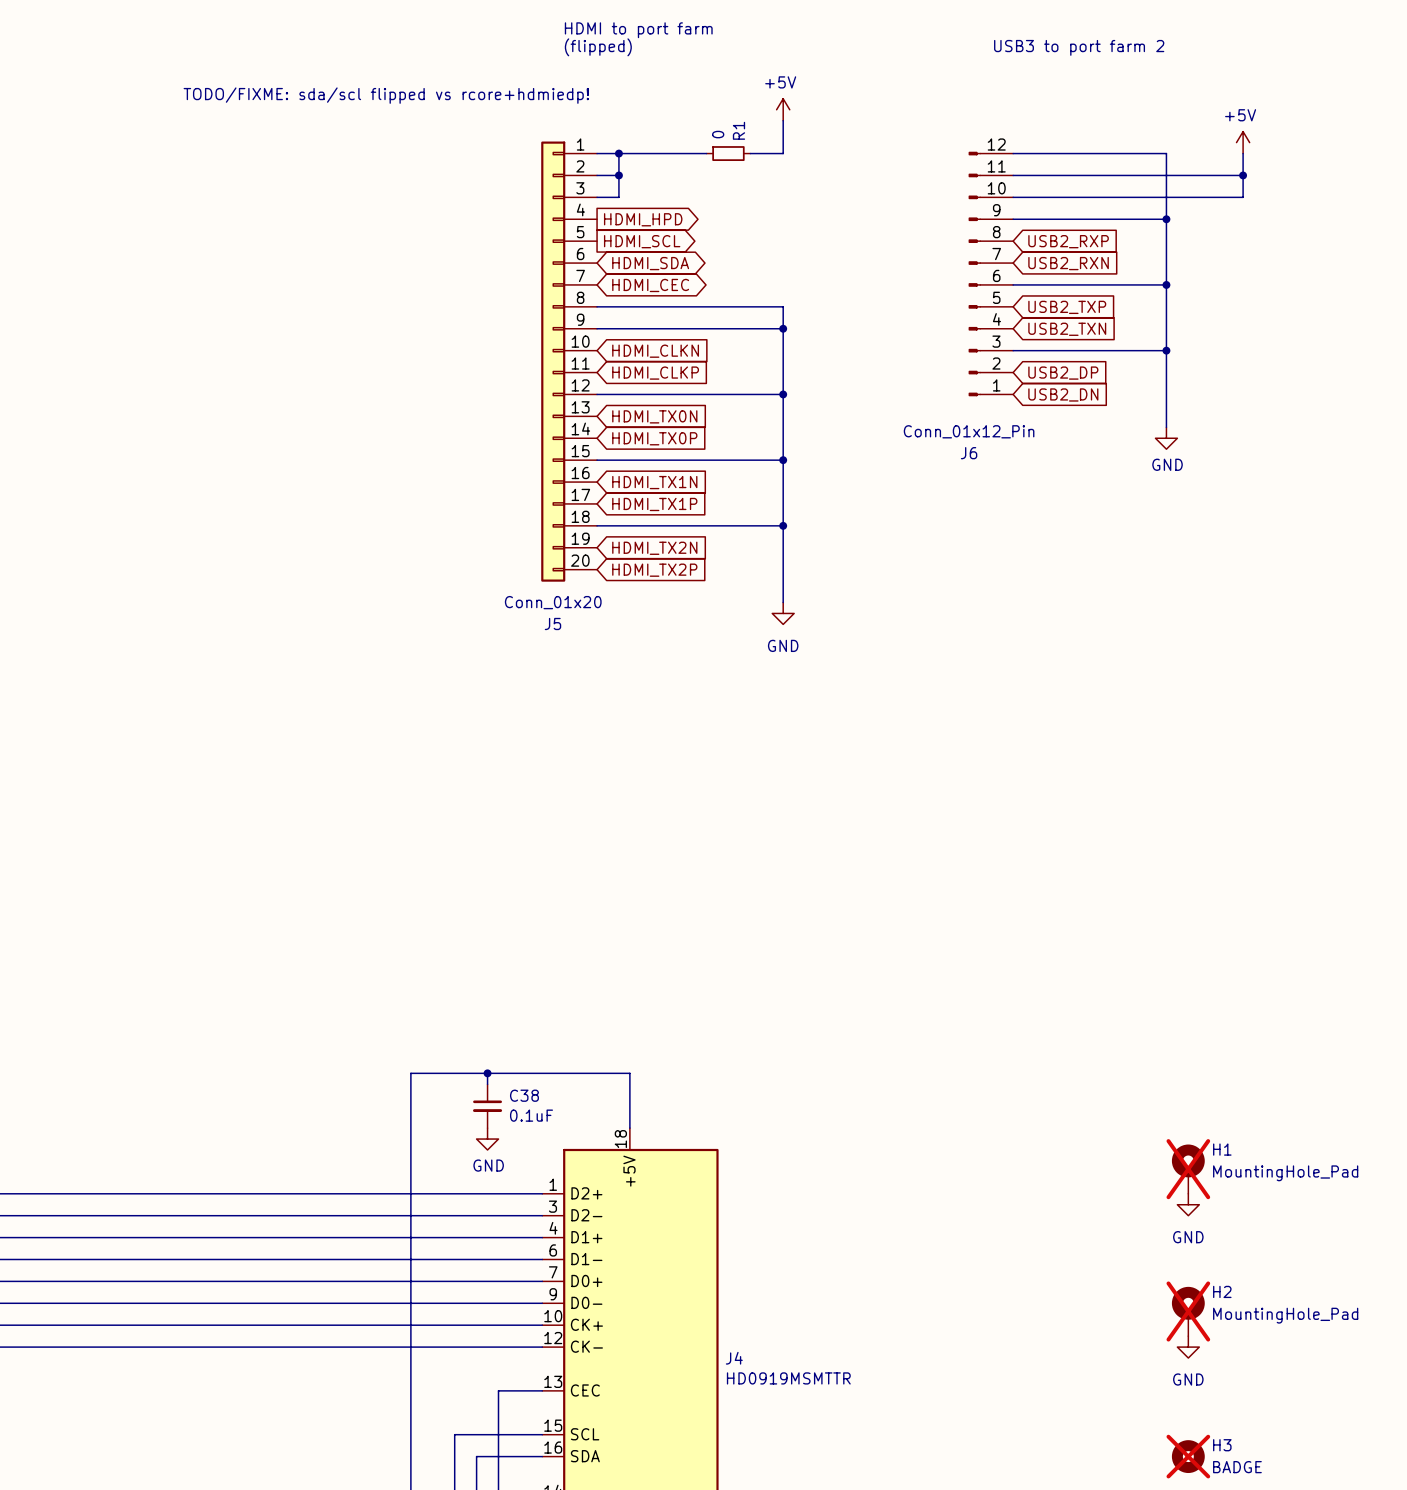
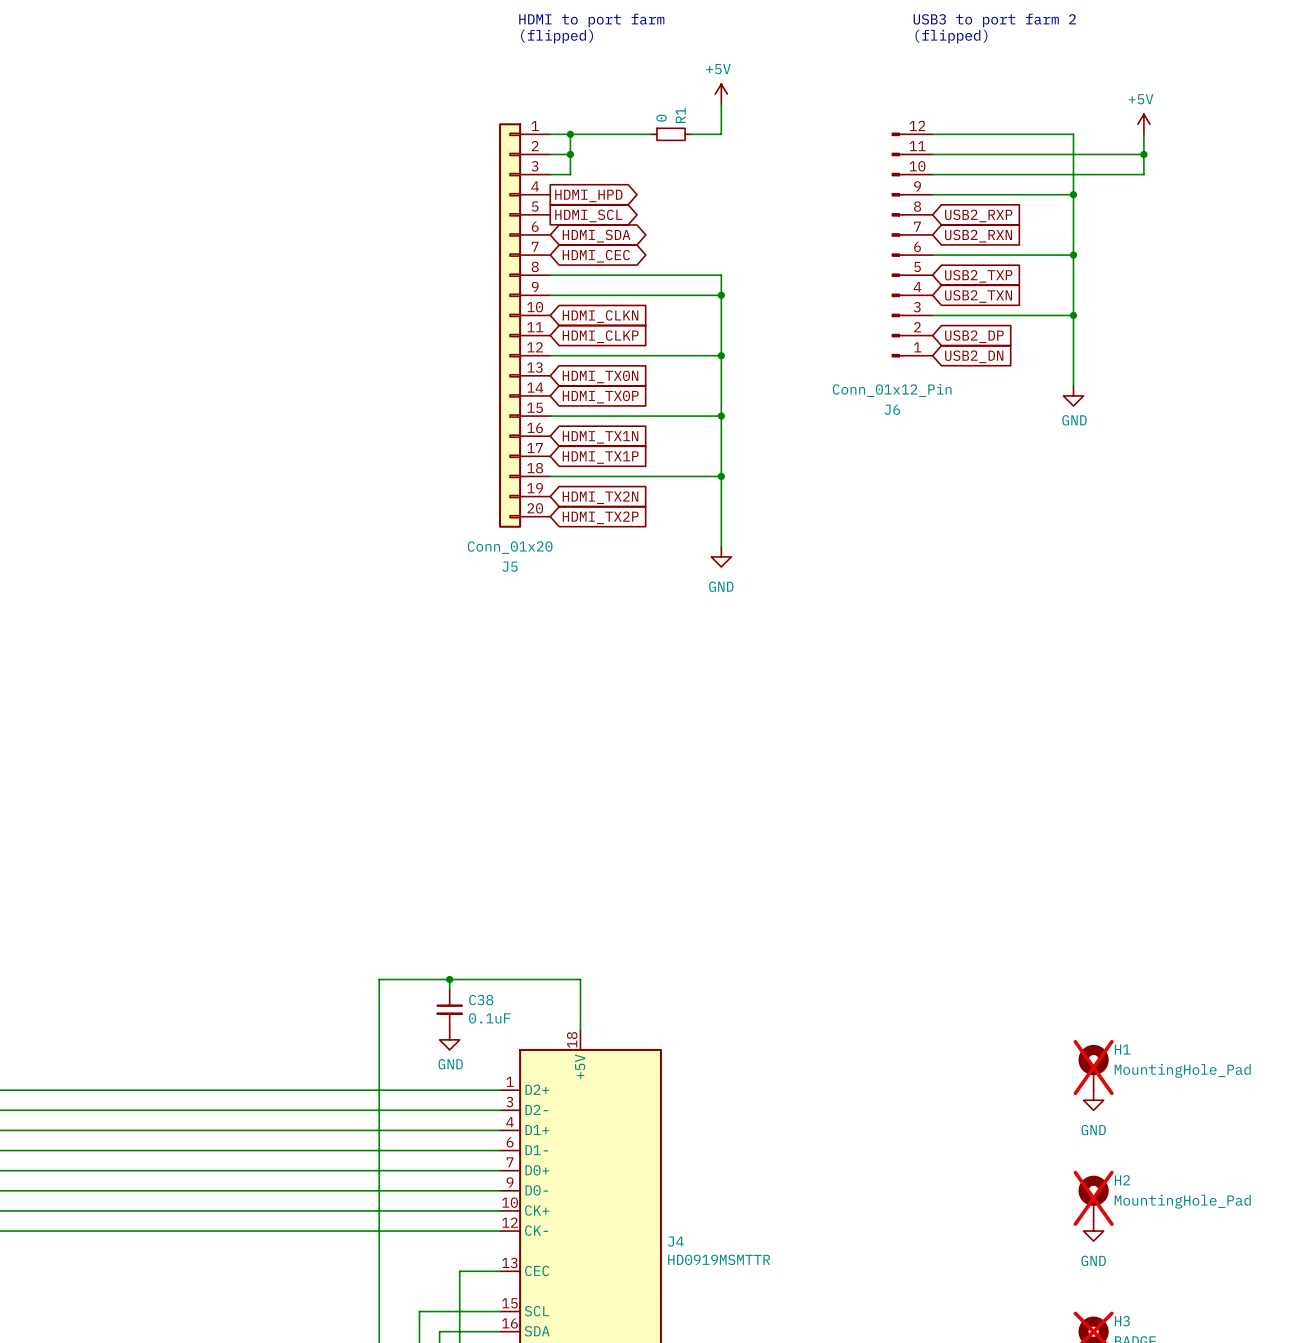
text: none -> USB3 to port farm 2 (994, 20)
text: USB3 to port farm 2 (1079, 47) -> (flipped) (951, 36)
text: TODO/FIXME: sda/scl flipped vs rcore+hdmiedp! (386, 95) -> none

